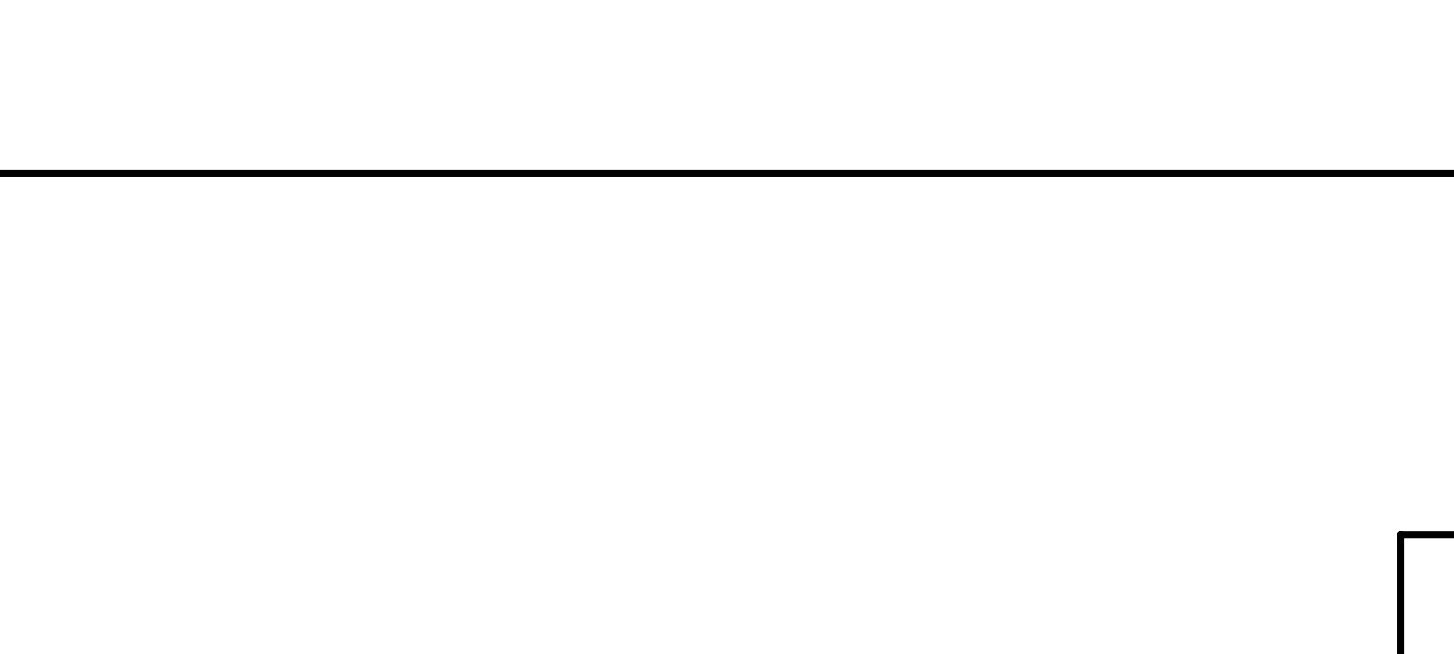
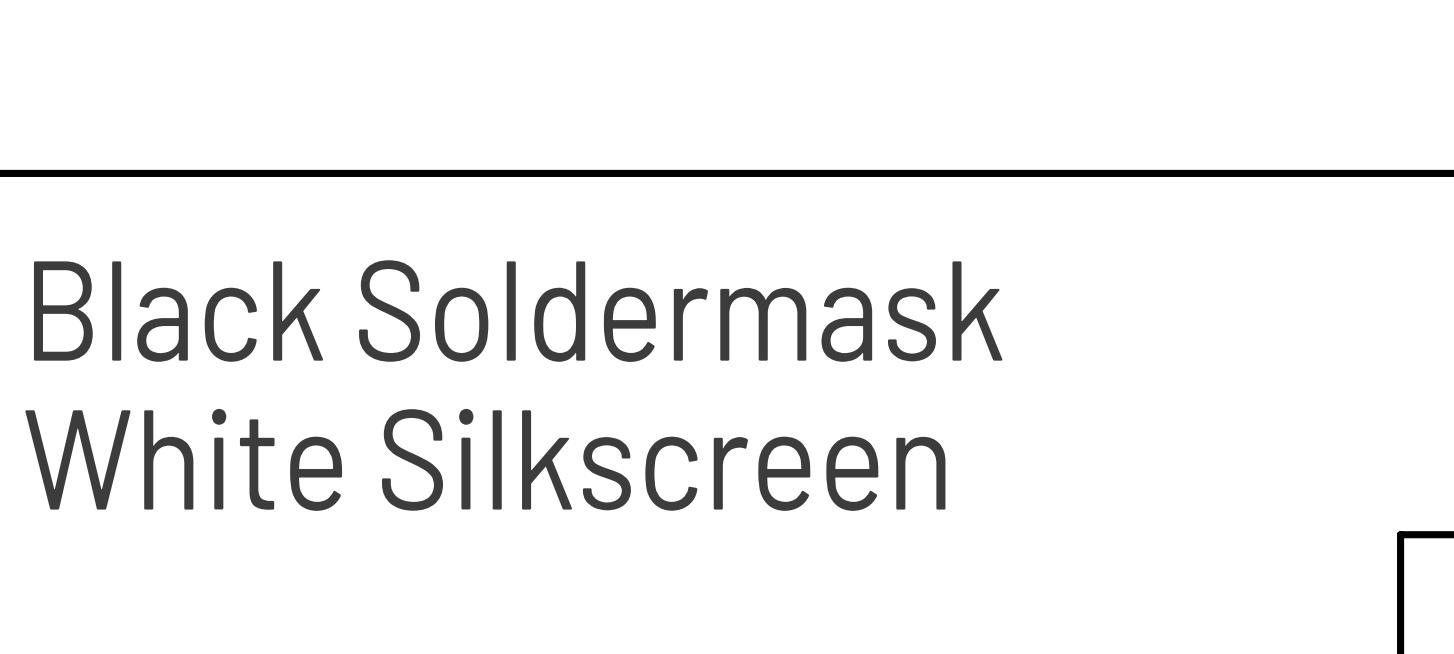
text: none -> Black Soldermask (518, 311)
text: none -> White Silkscreen (485, 459)

